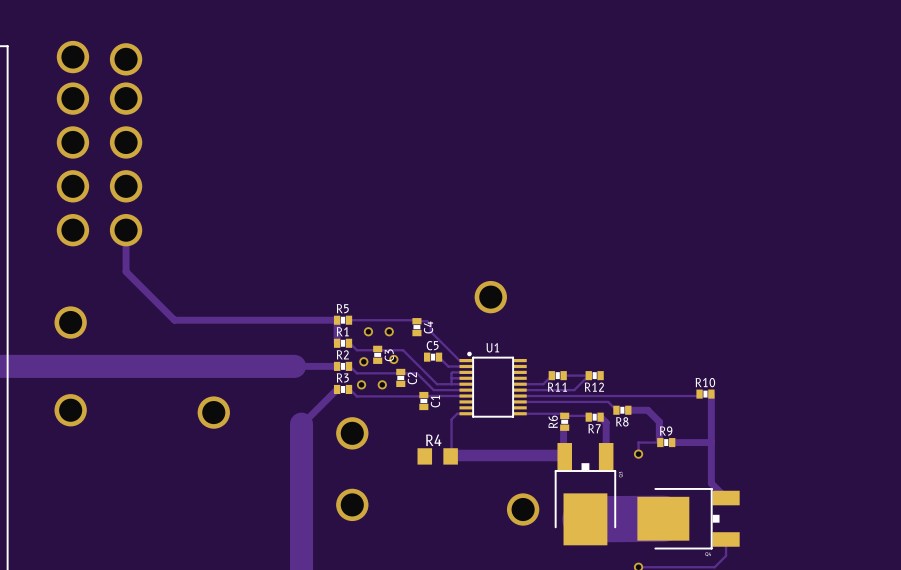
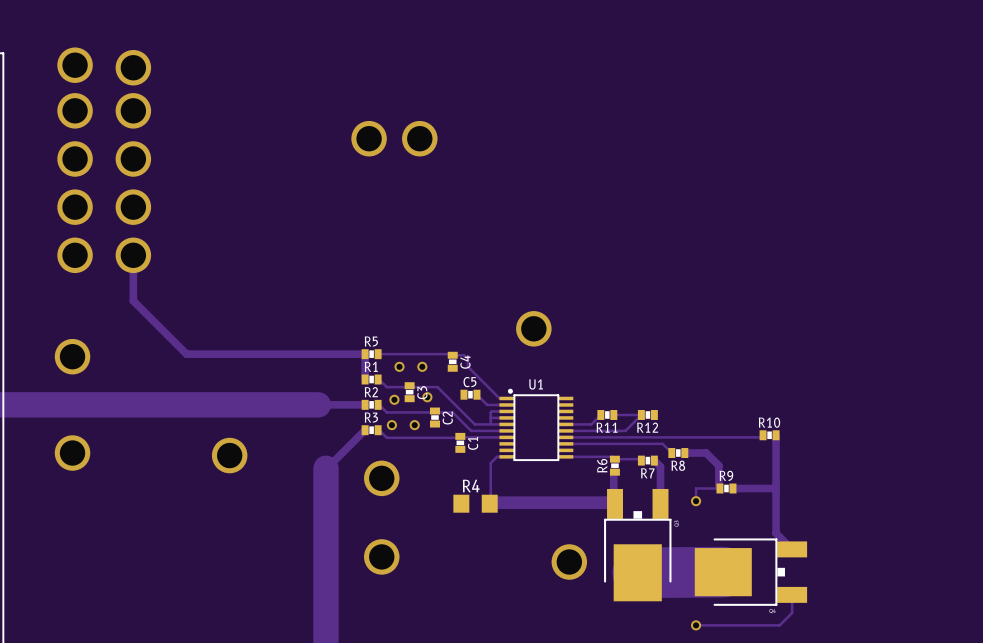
via: none -> (369, 138)
via: none -> (419, 138)

